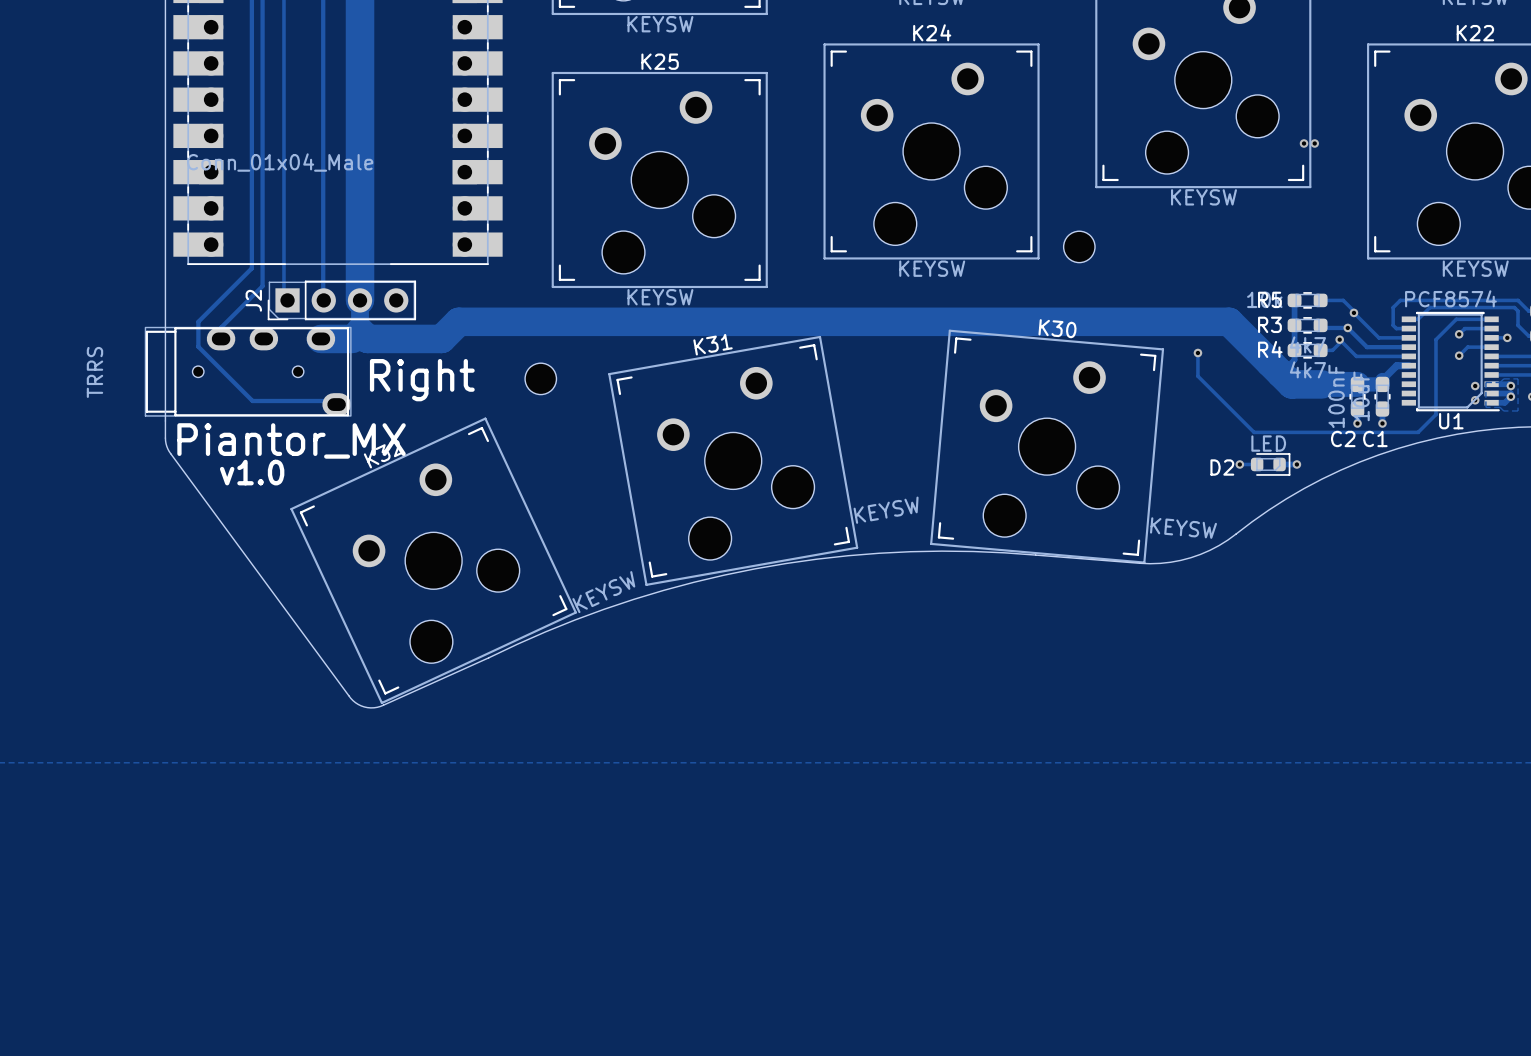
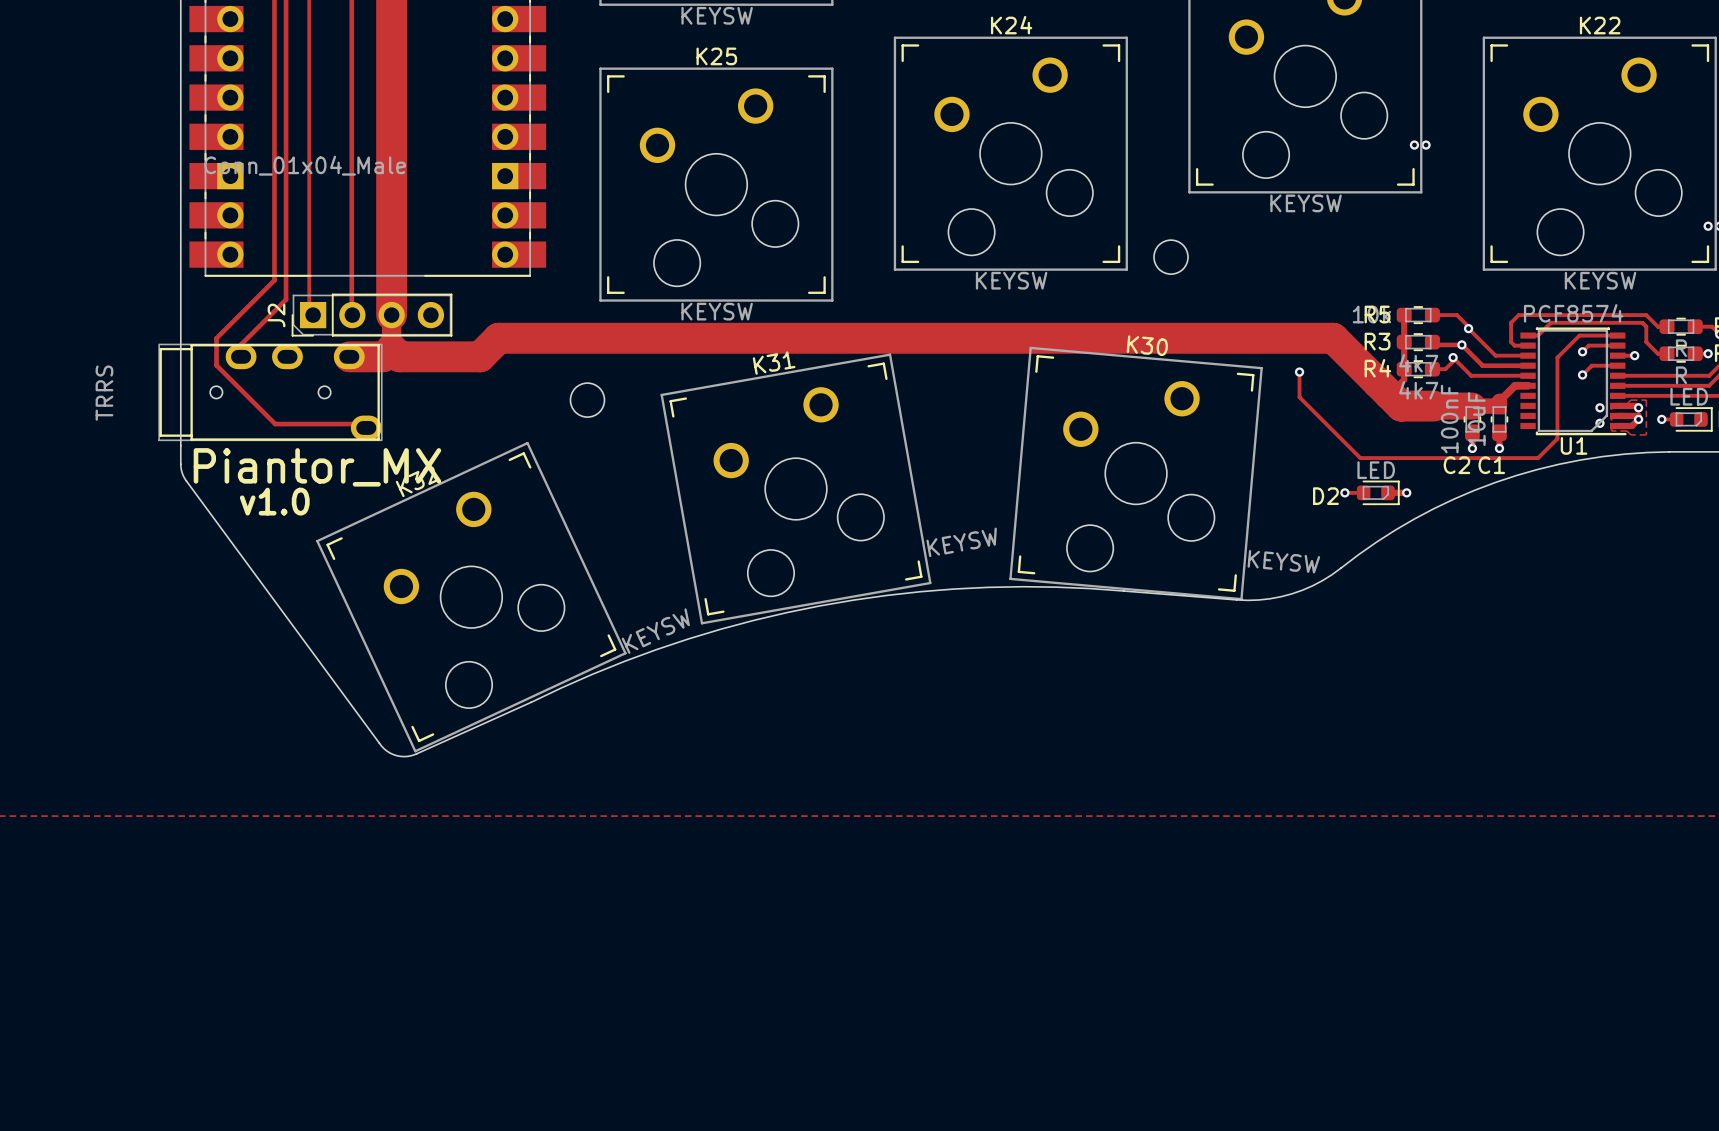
text: Right (422, 380) -> none

